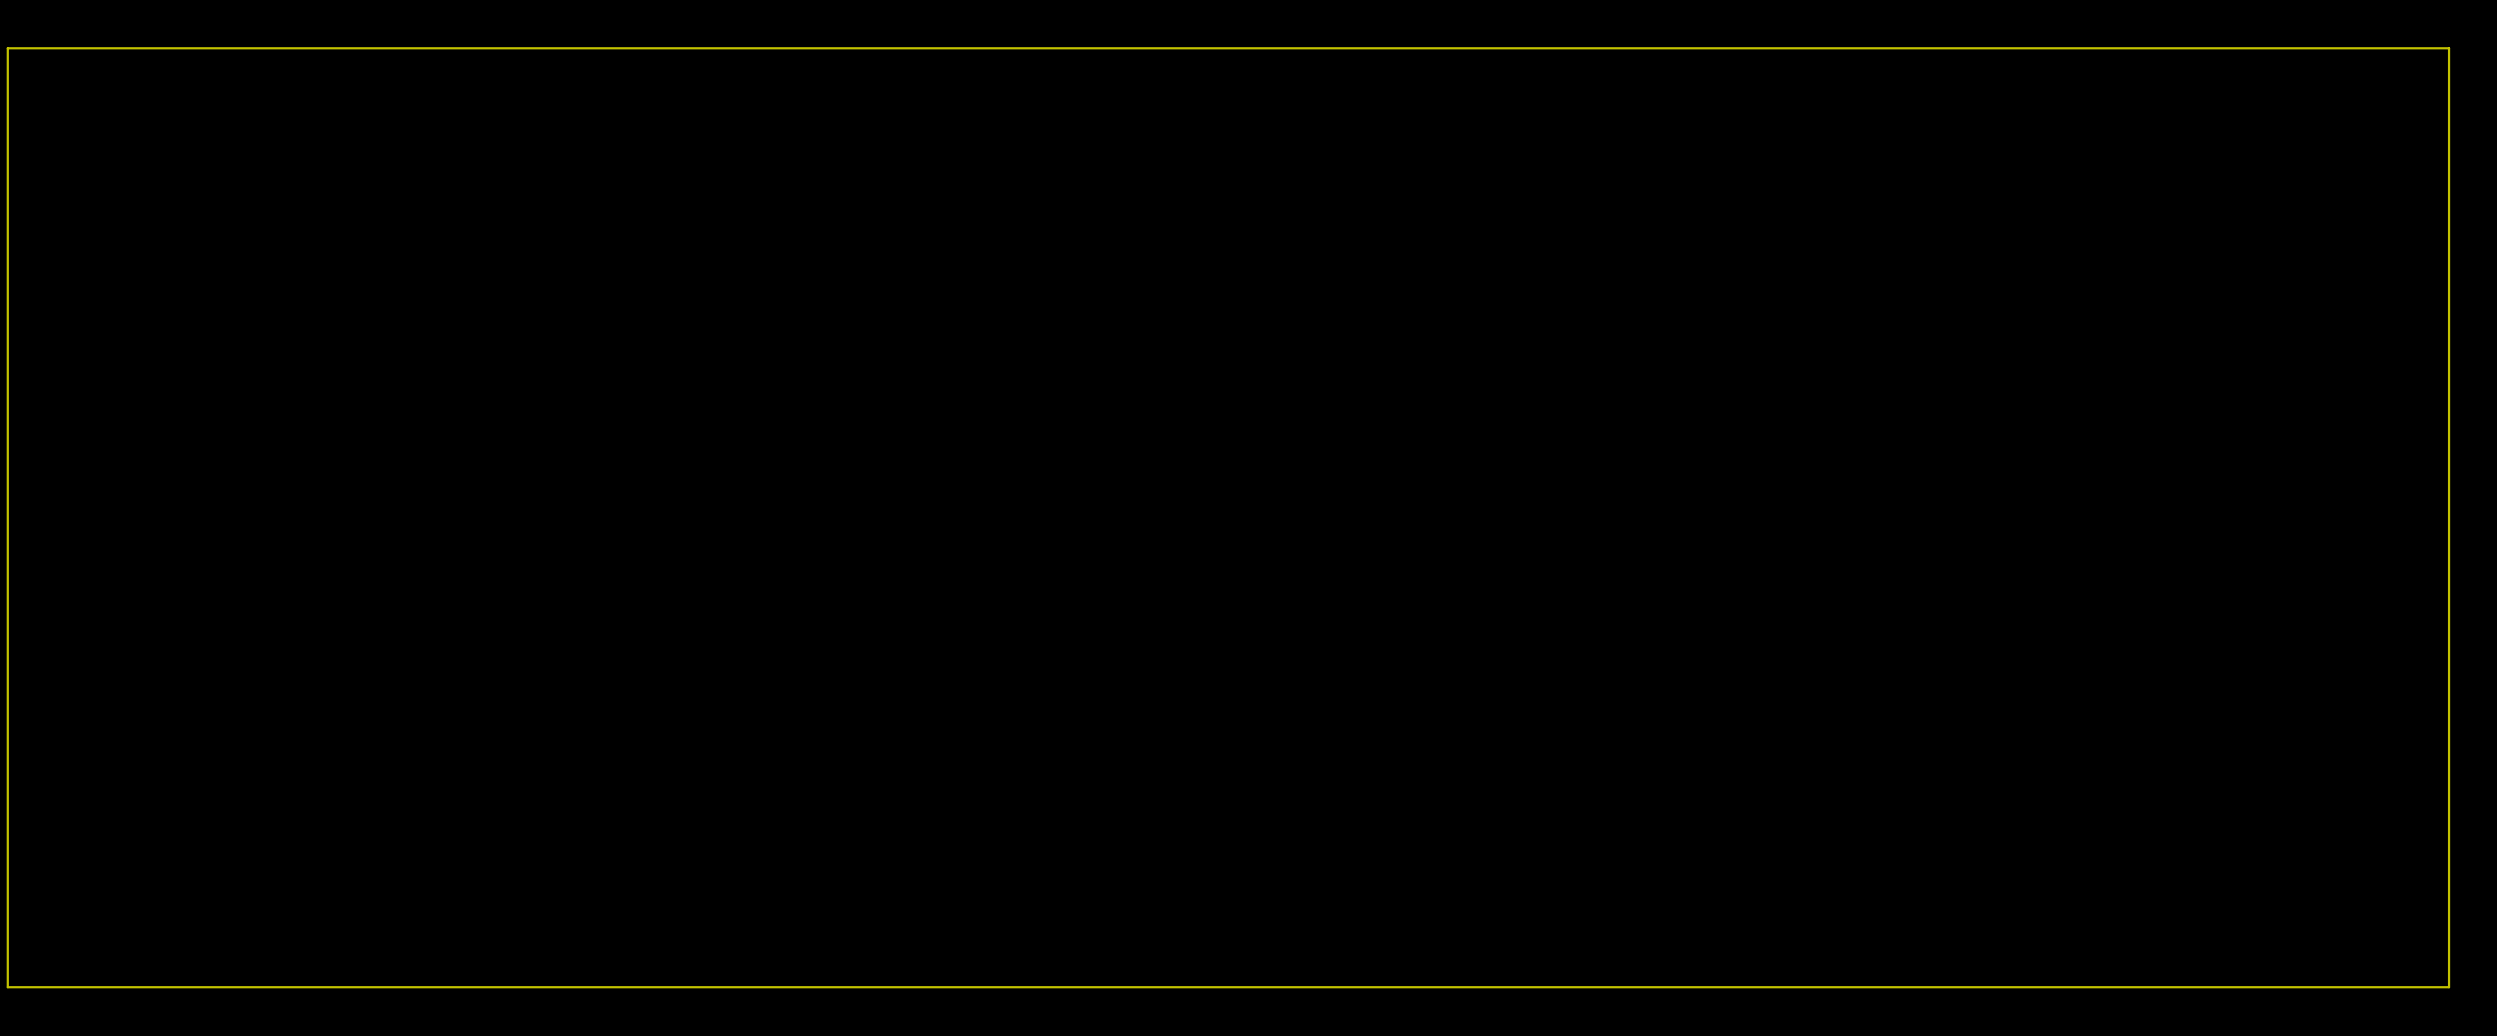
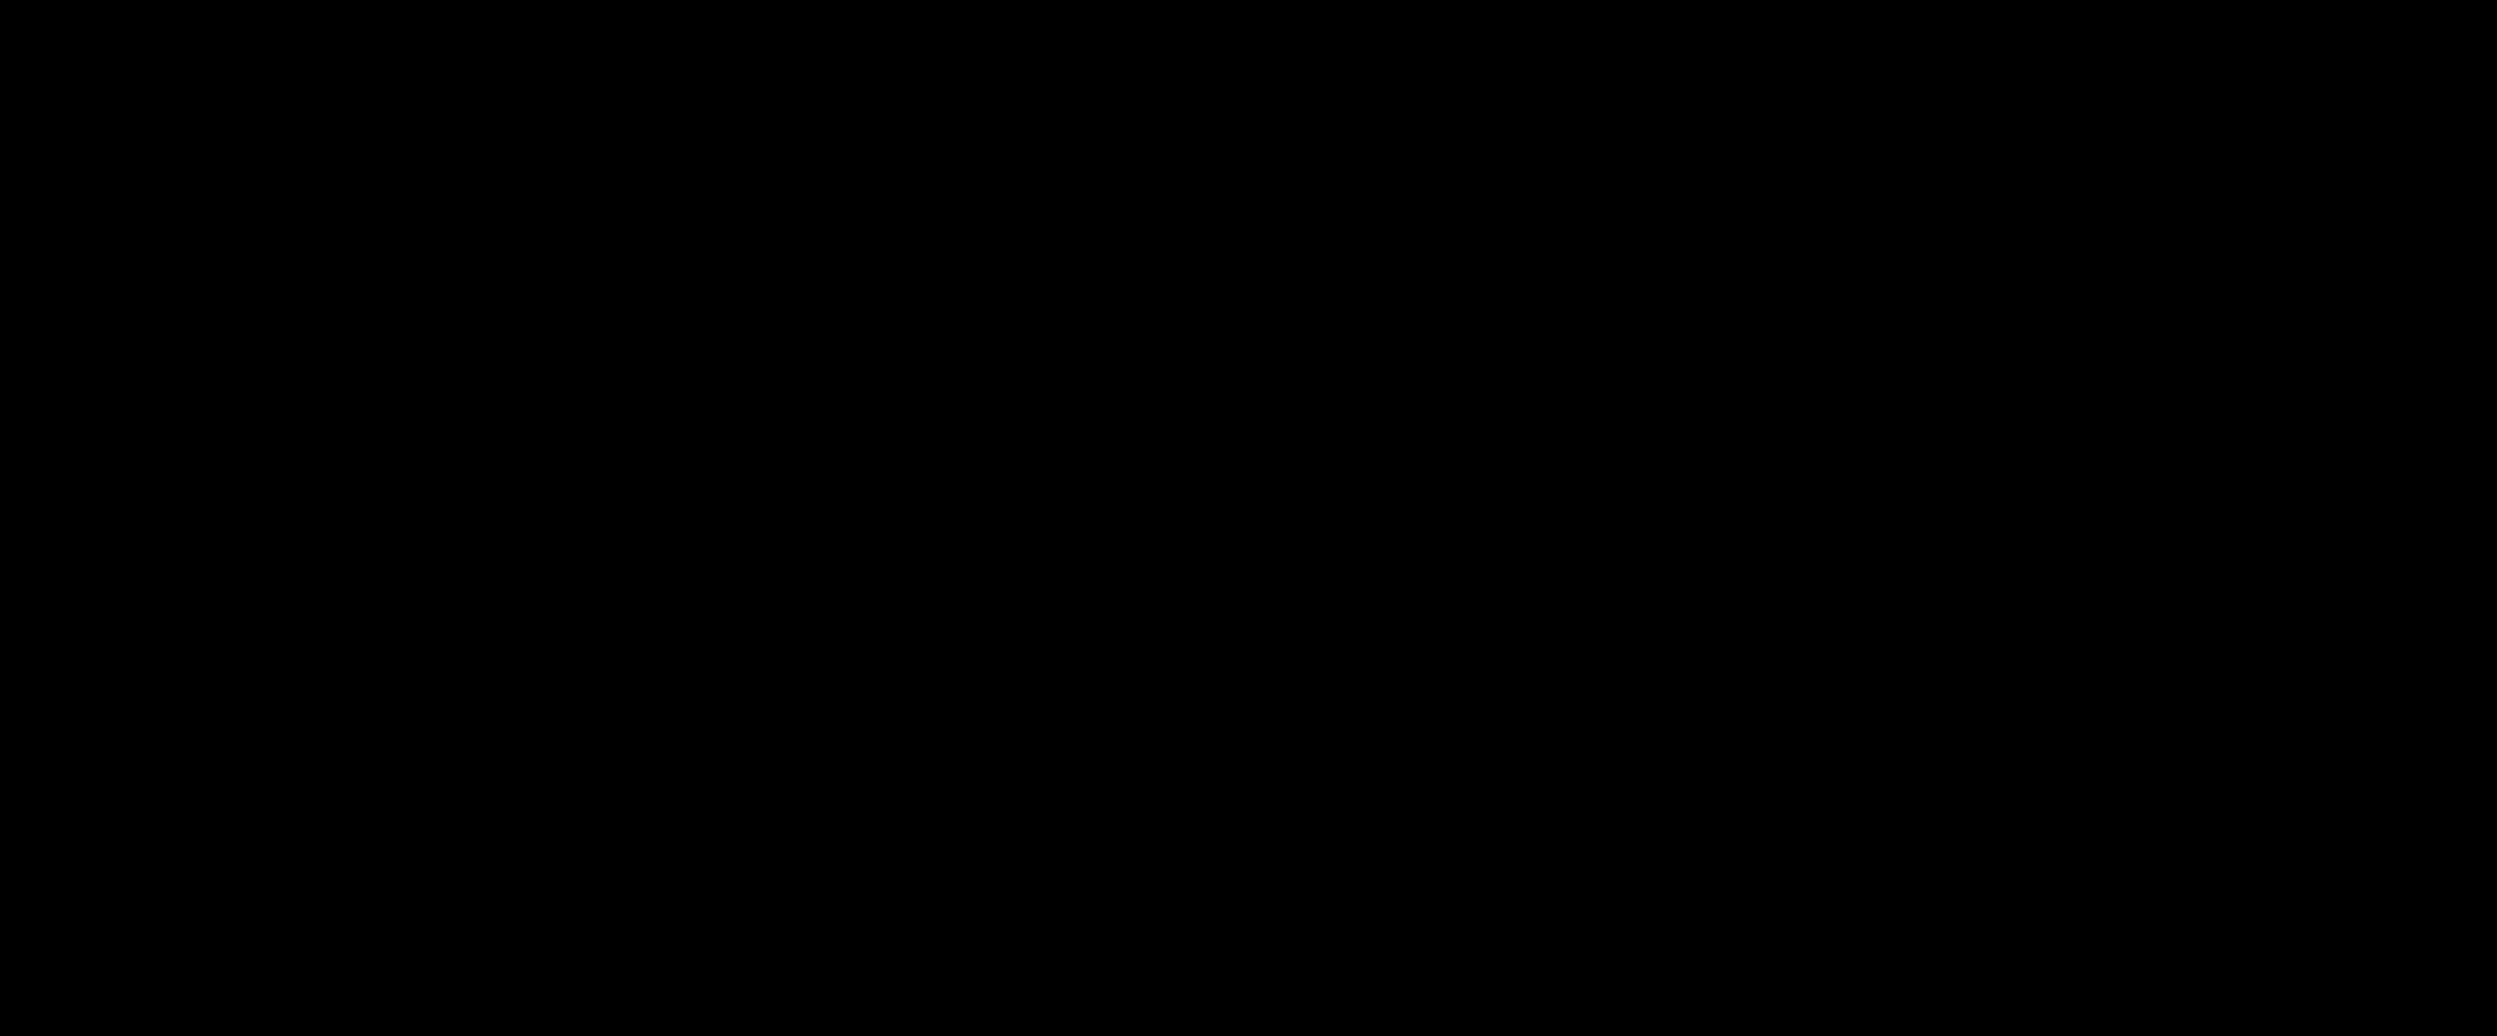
board edge: (7, 48) (7, 987) (2449, 987) (2449, 48) (7, 48) -> none

